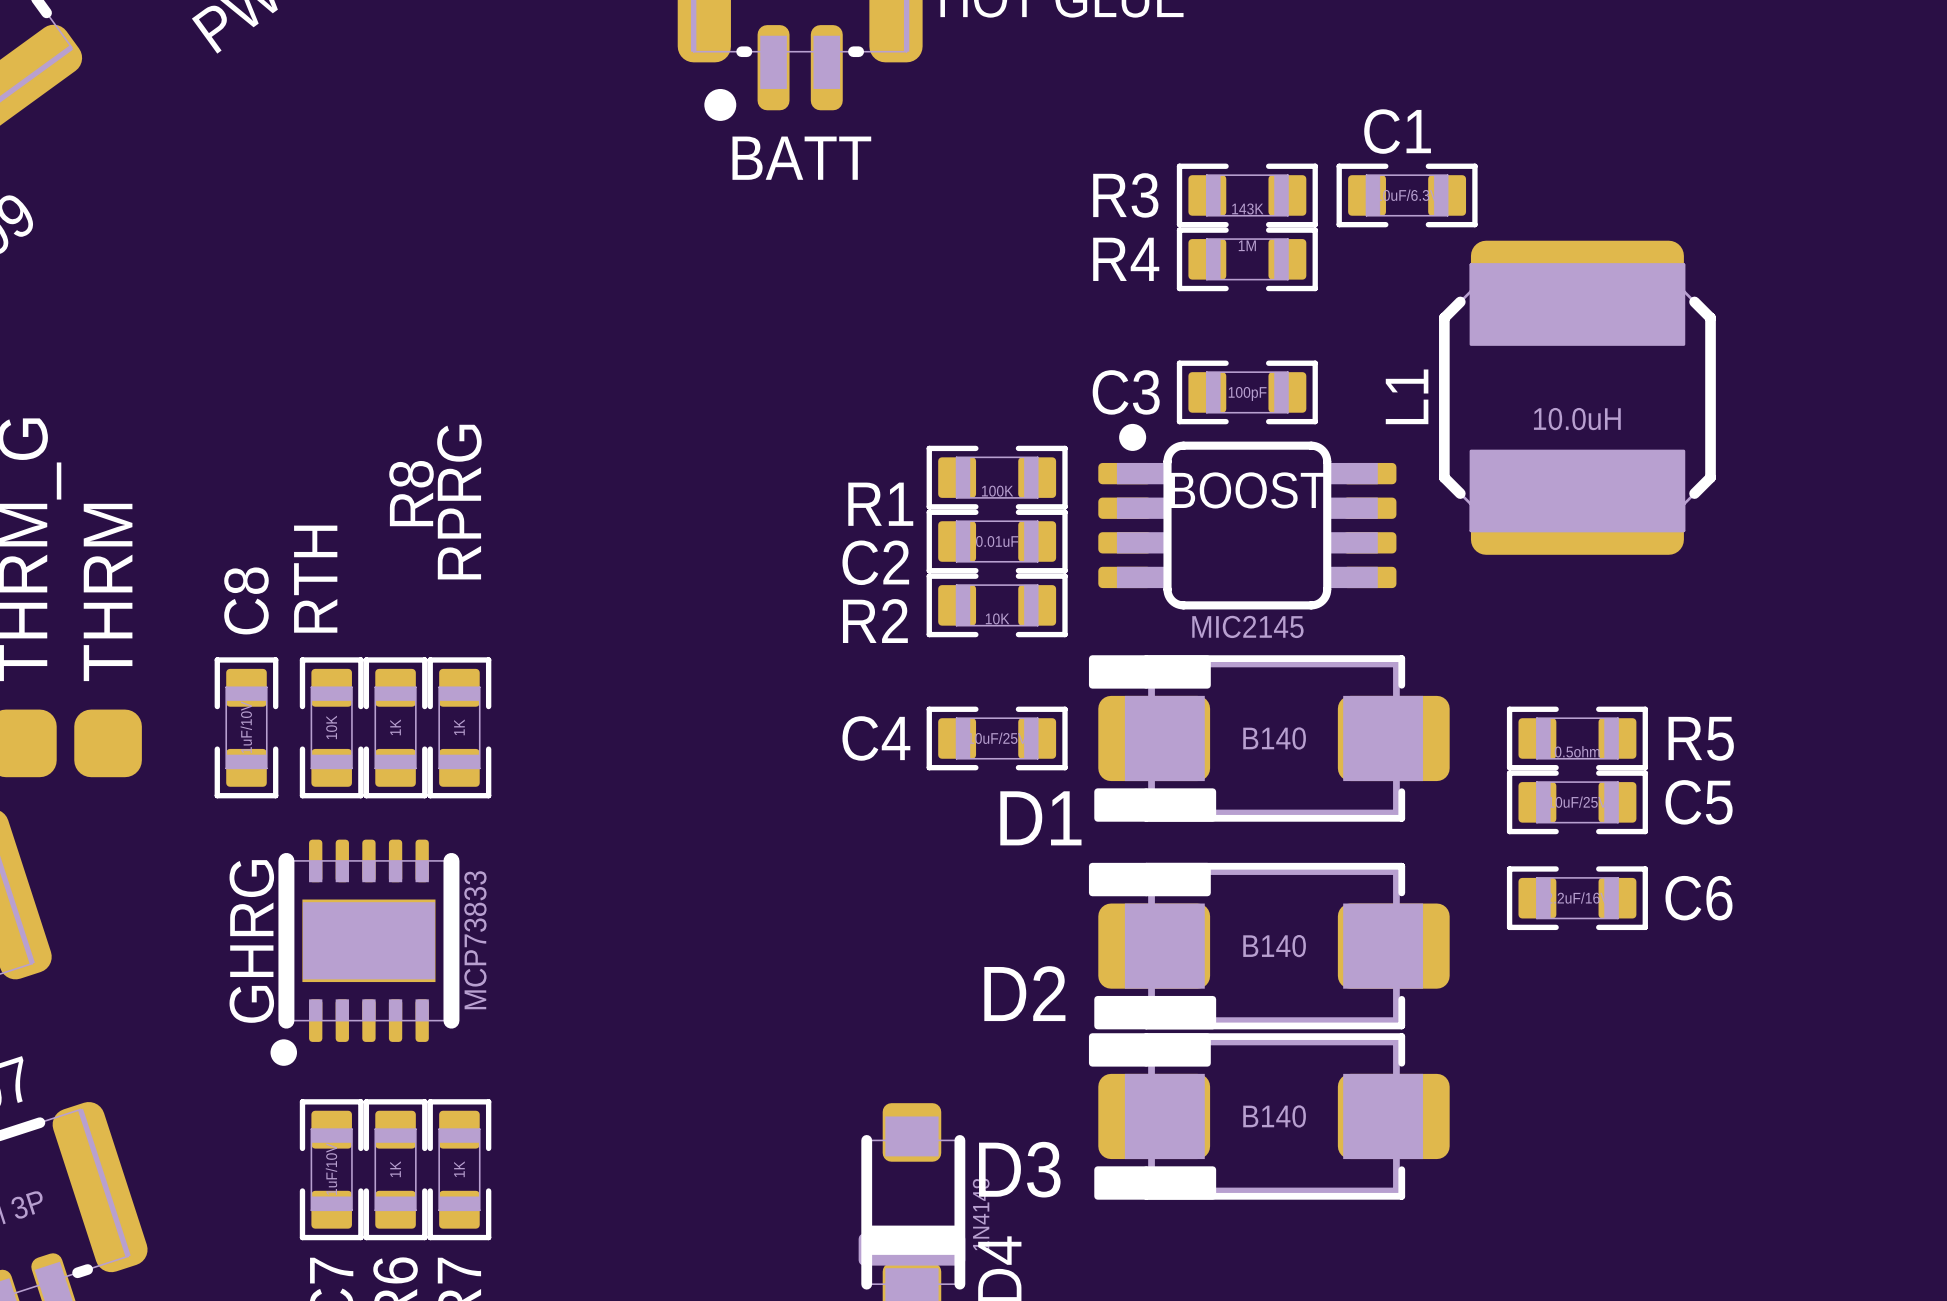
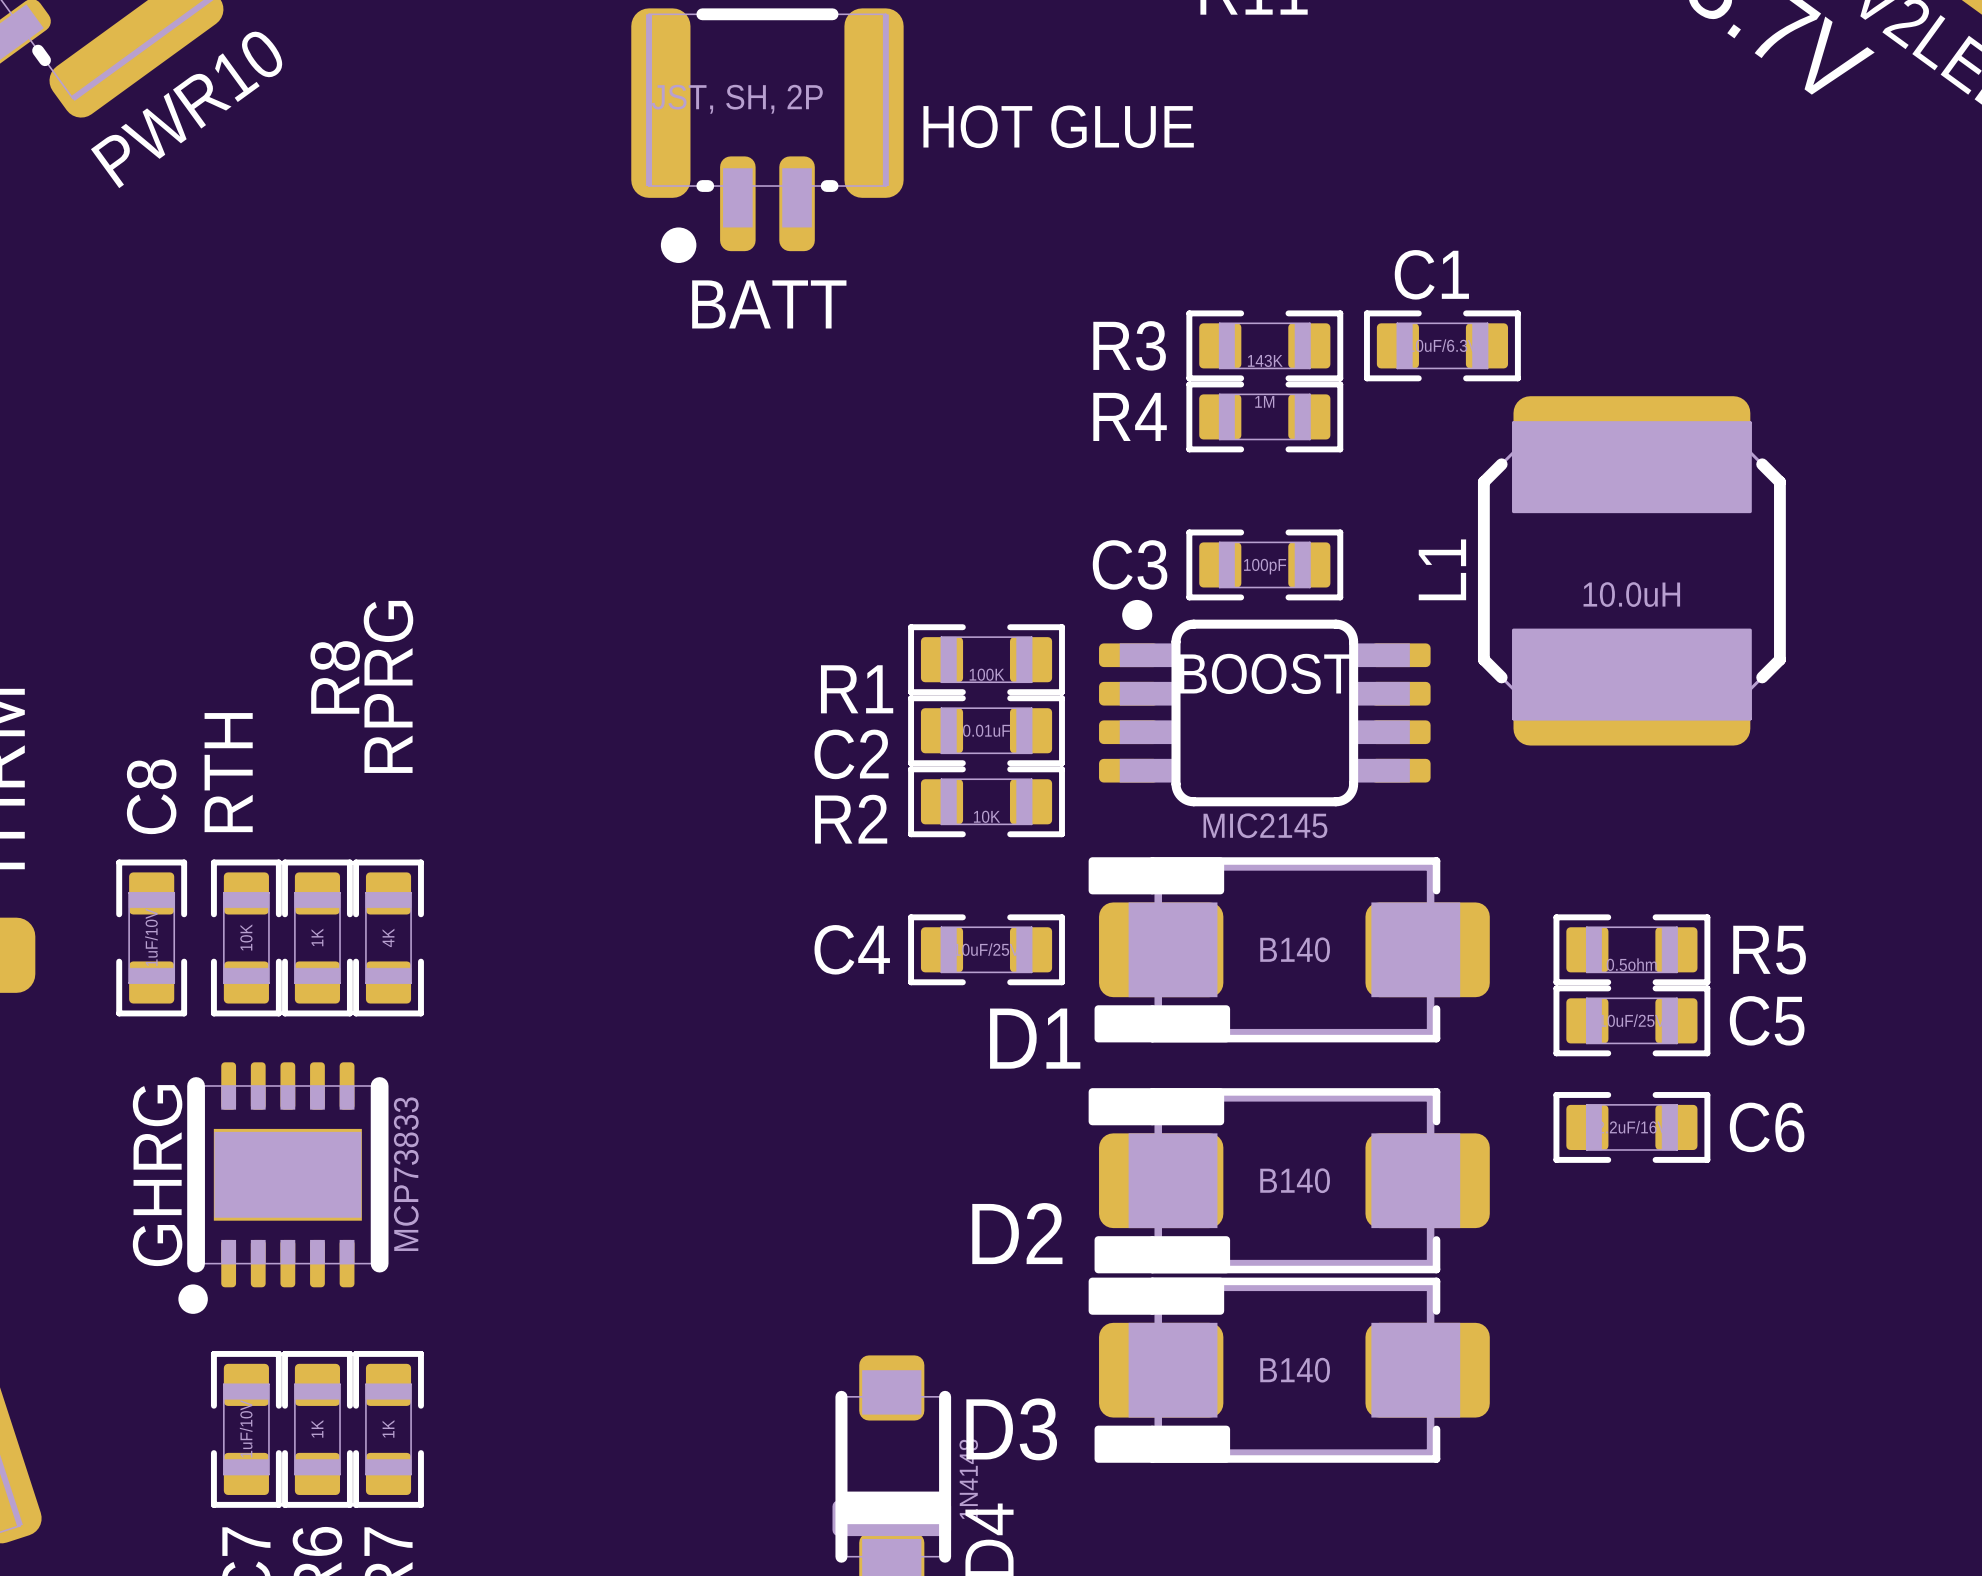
RPRG value: 1K (459, 727) -> 4K (388, 937)

